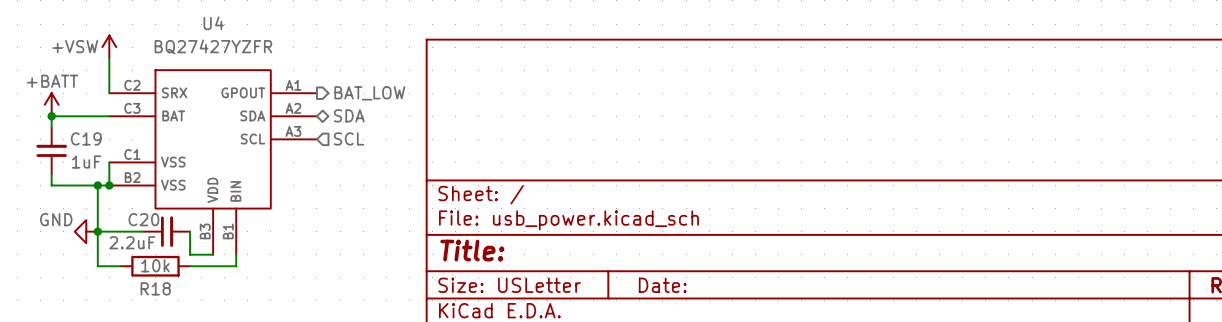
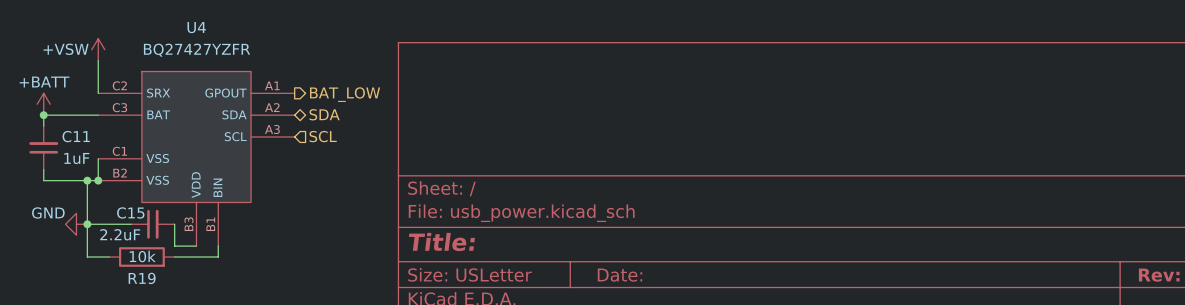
C19 name: C19 (86, 138) -> C11 (76, 136)
C20 name: C20 (143, 219) -> C15 (130, 212)
R18 name: R18 (155, 288) -> R19 (142, 278)

